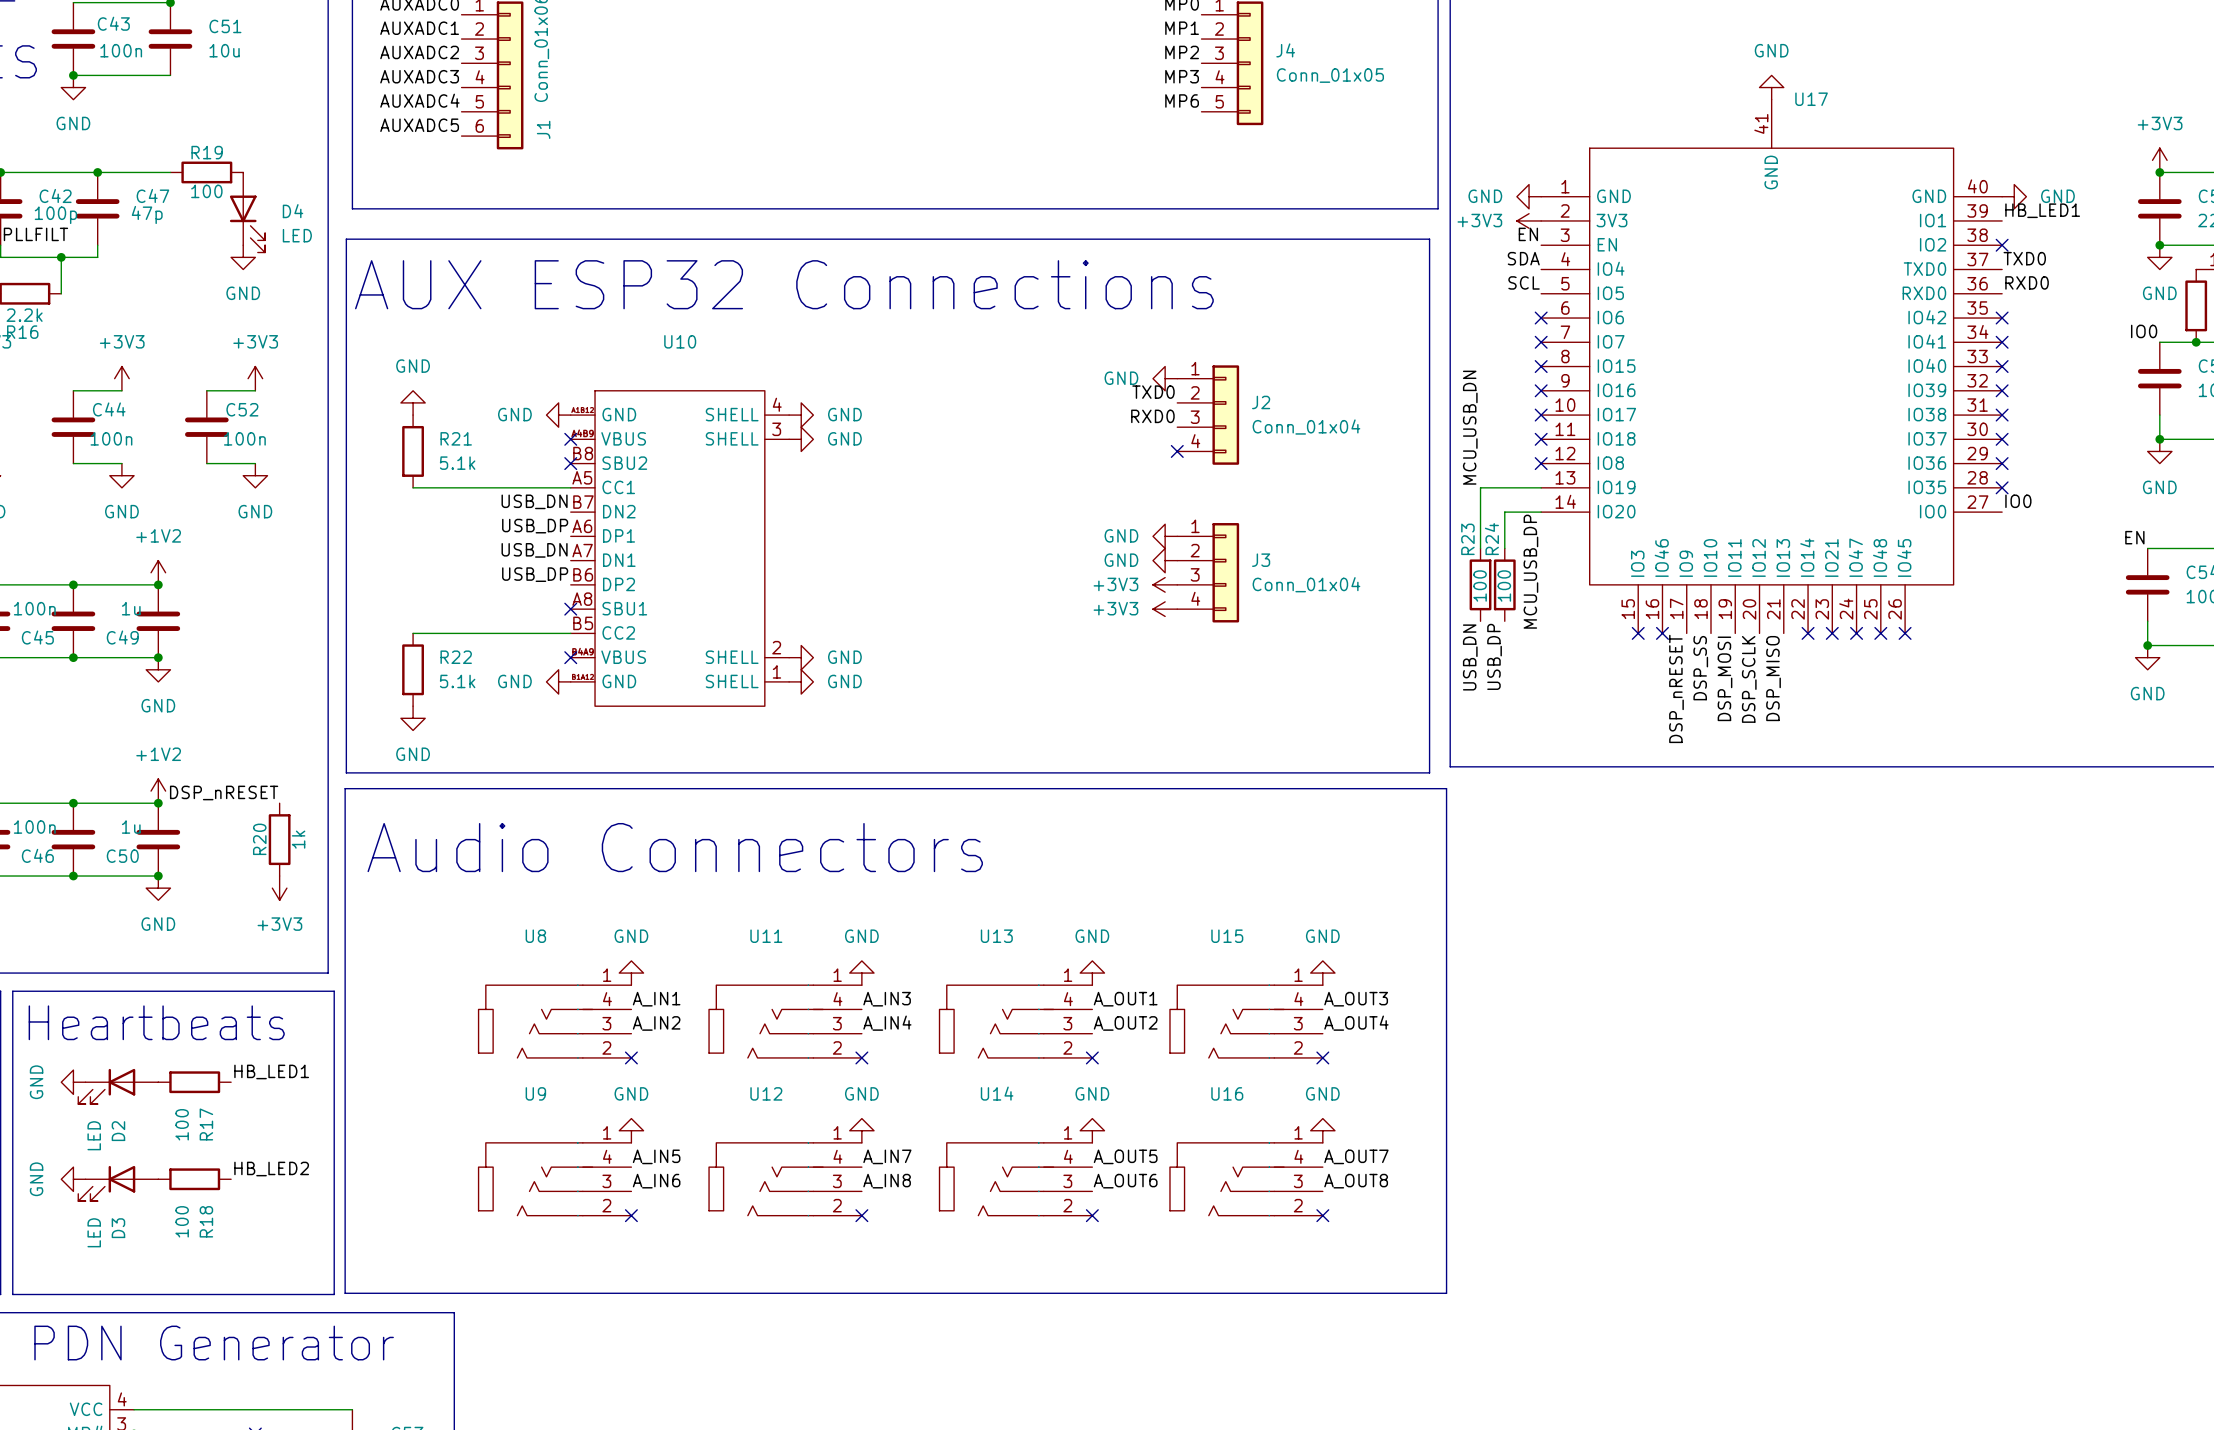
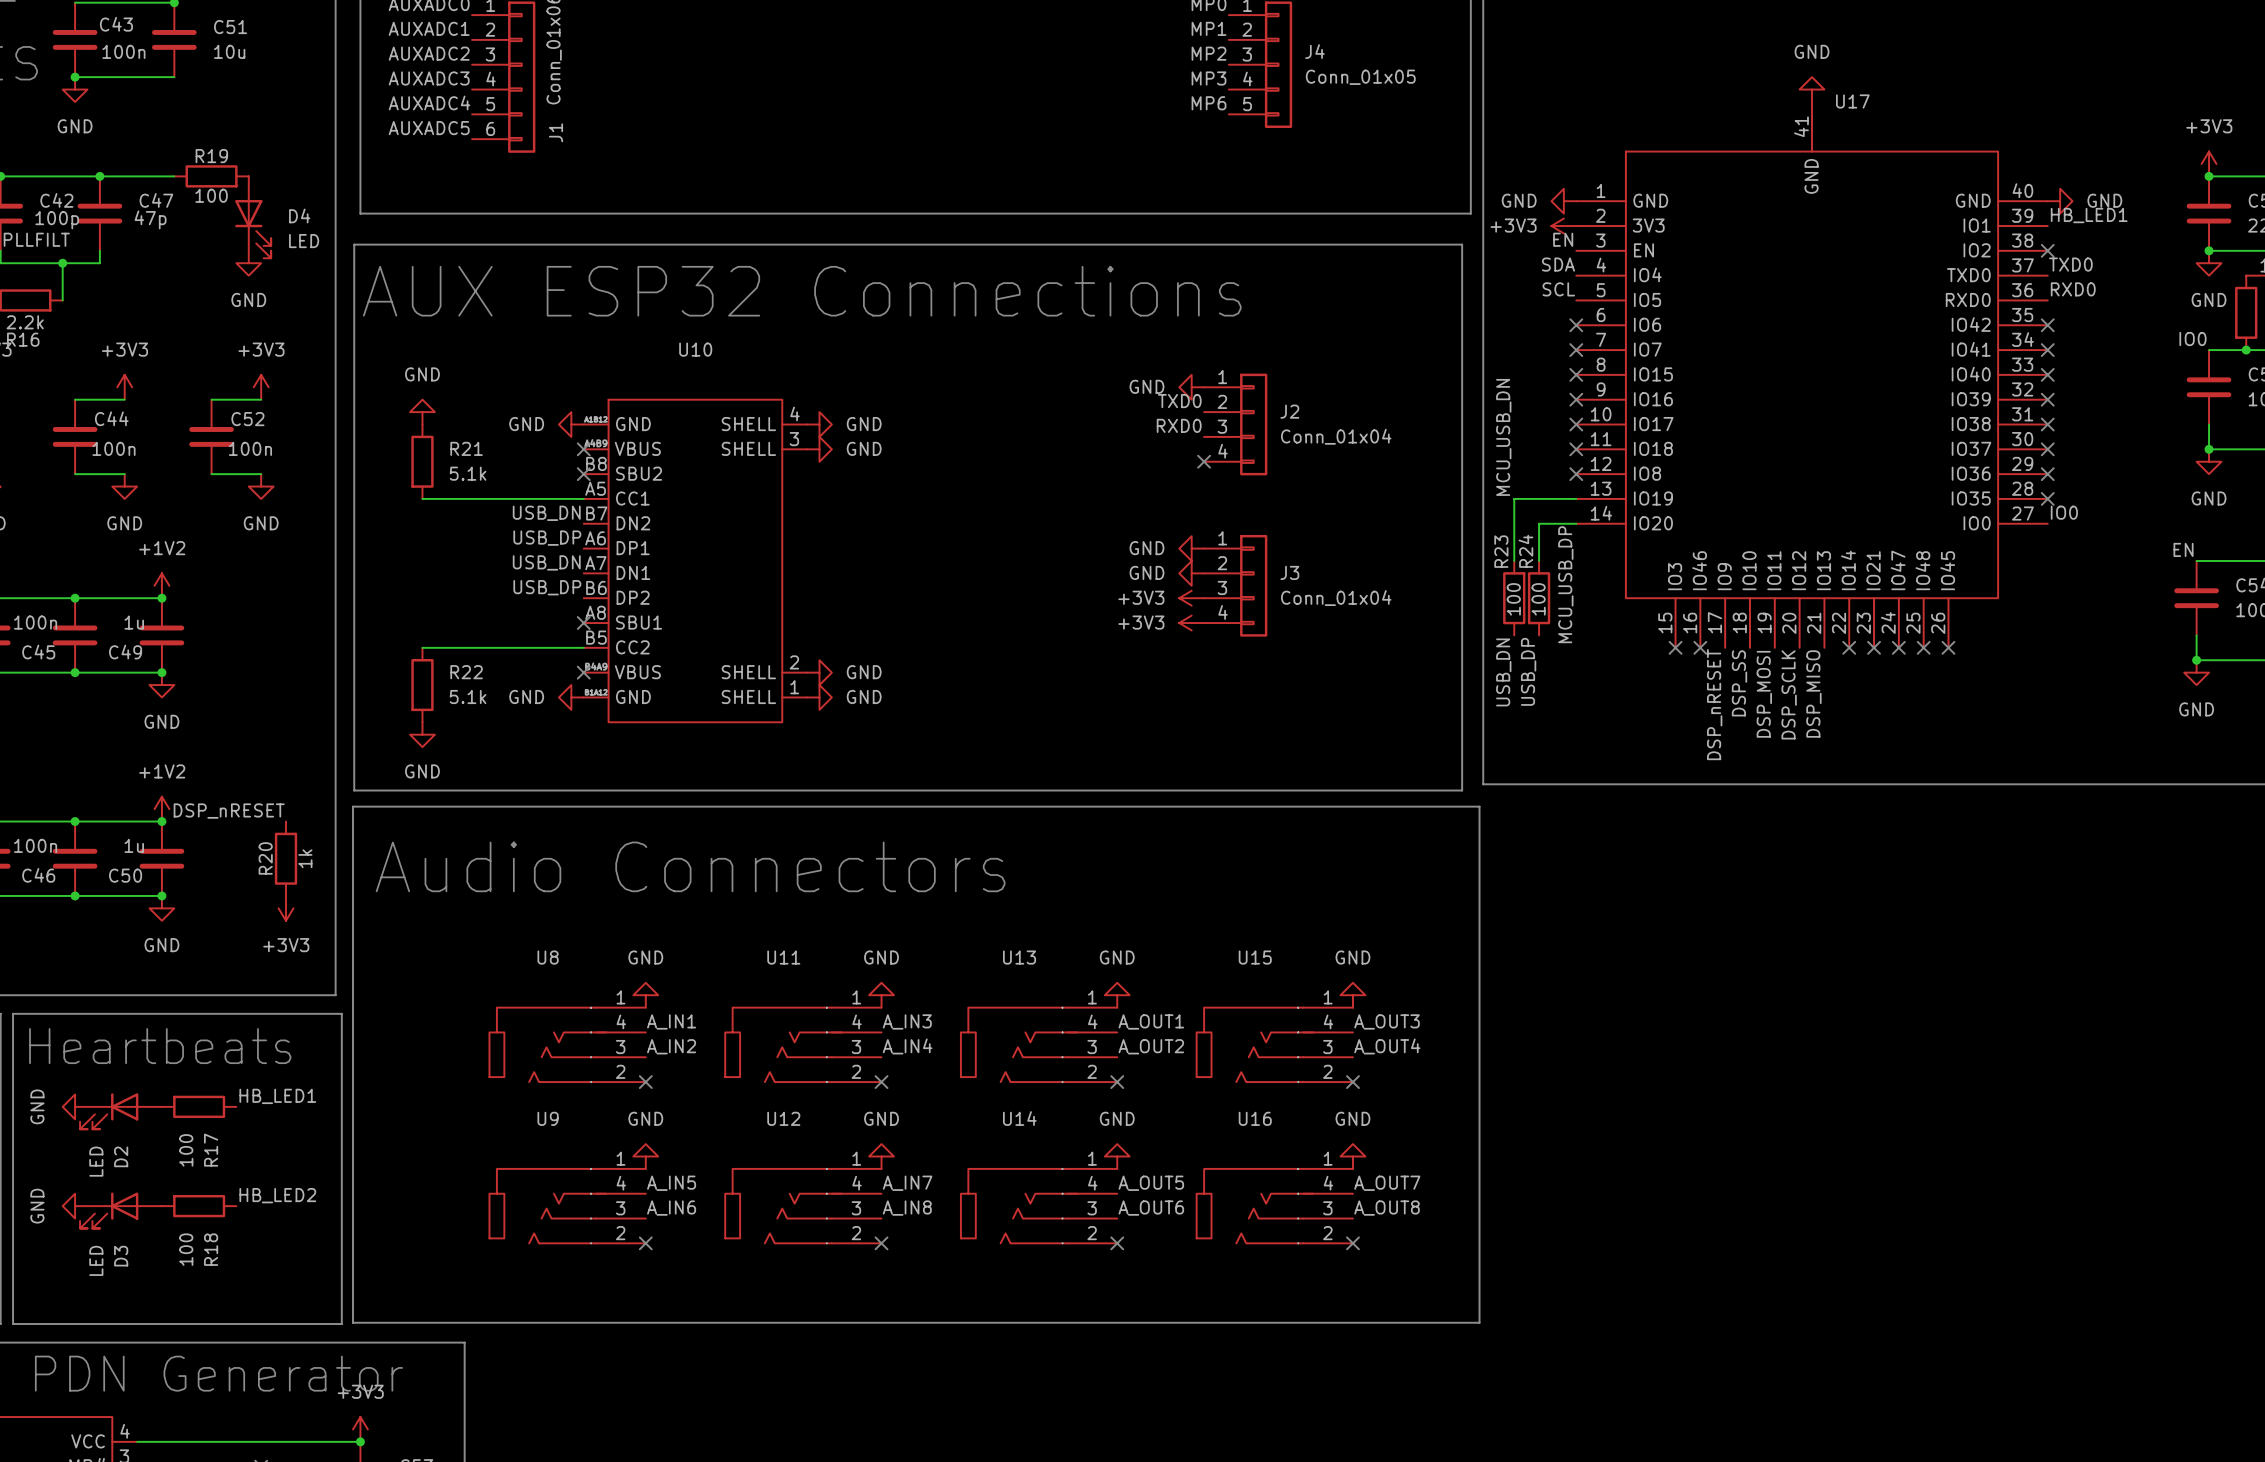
power symbol: none -> +3V3 (360, 1429)
junction: none -> (360, 1441)

